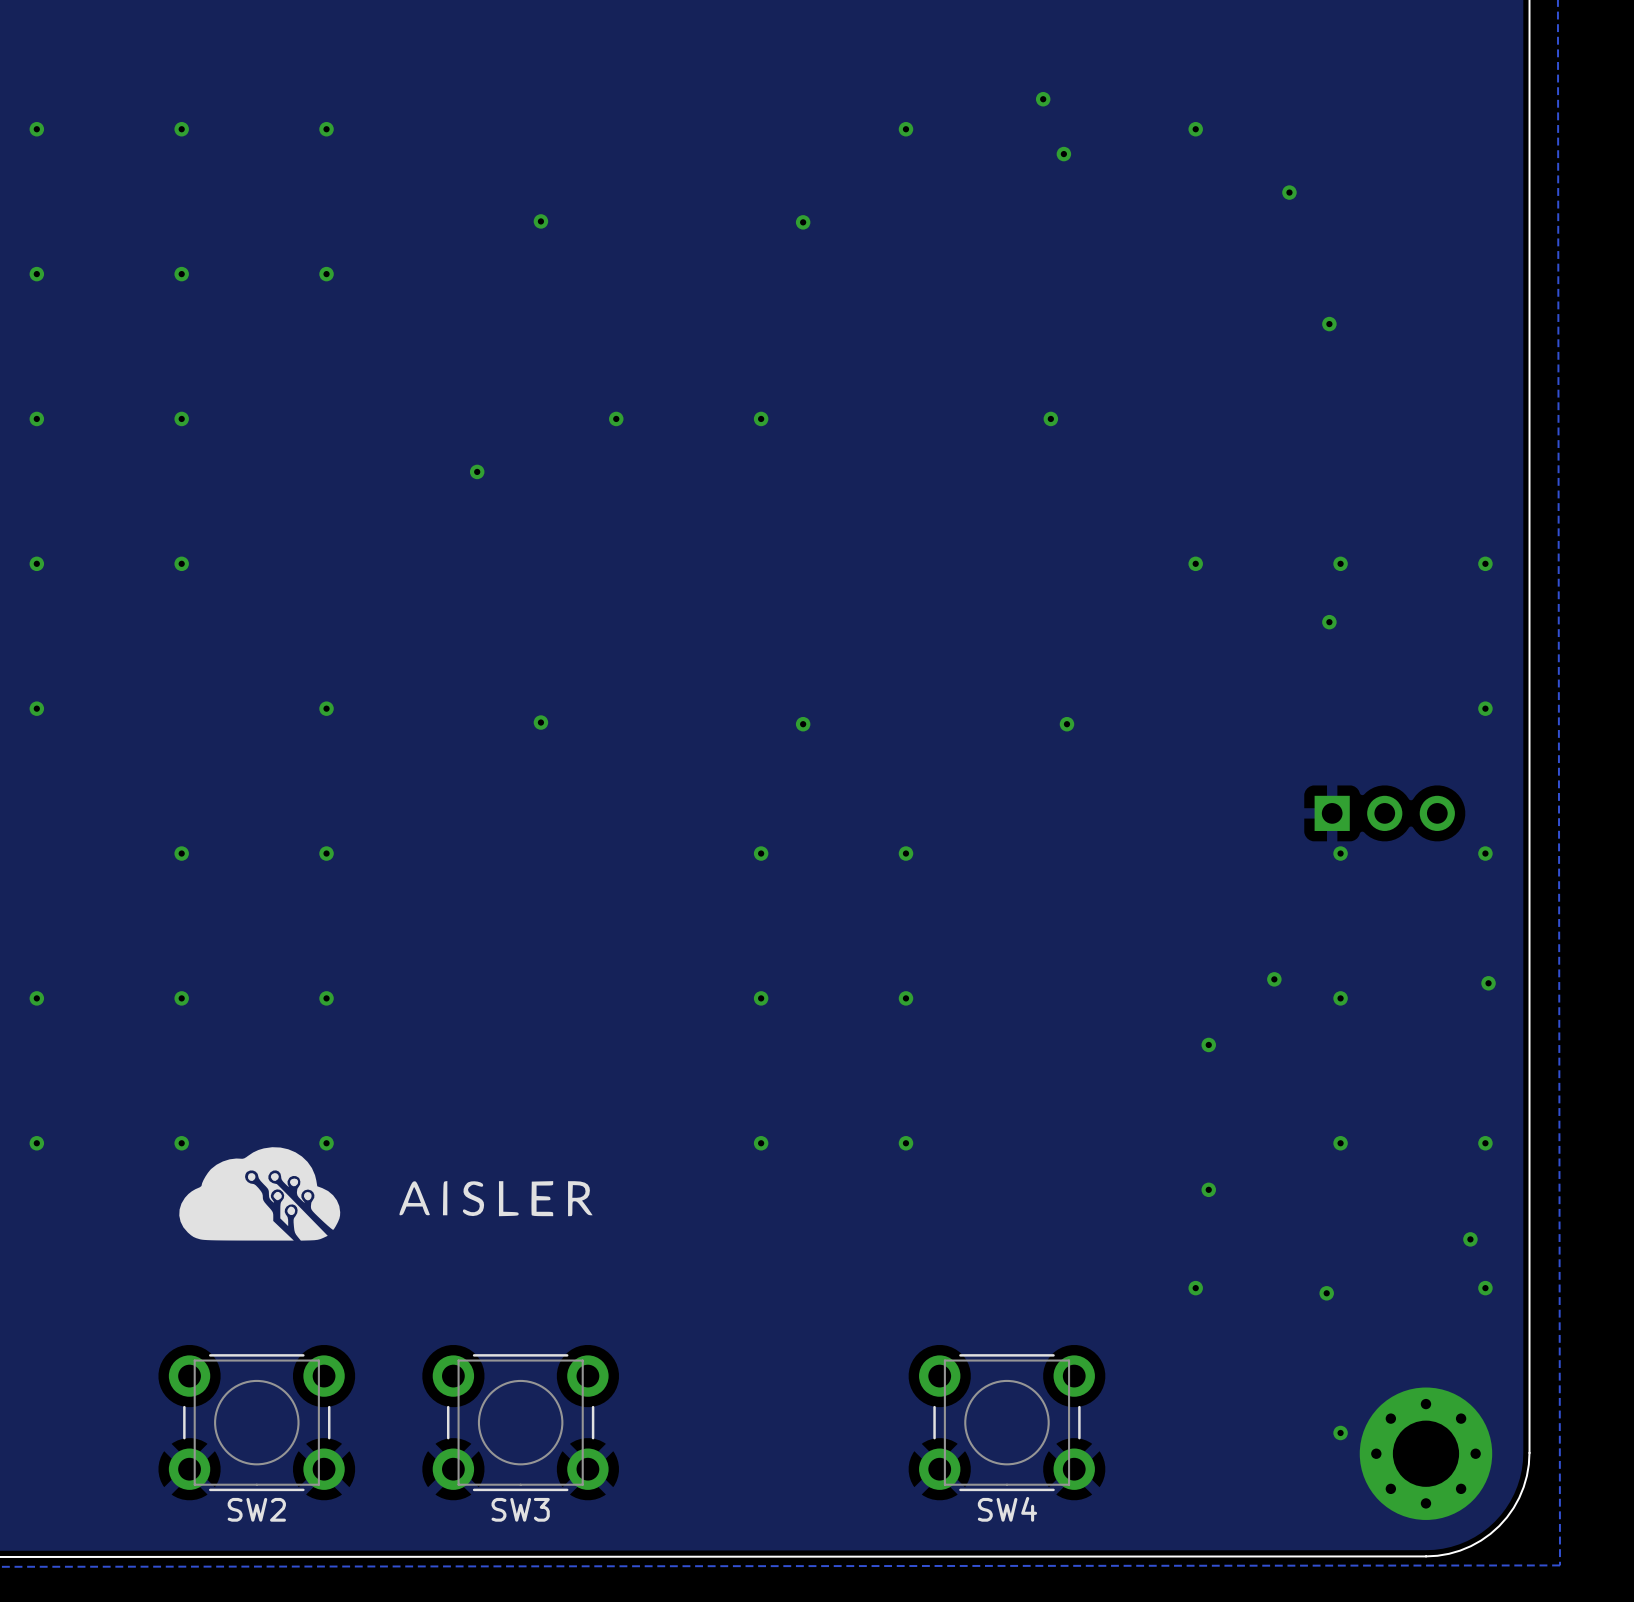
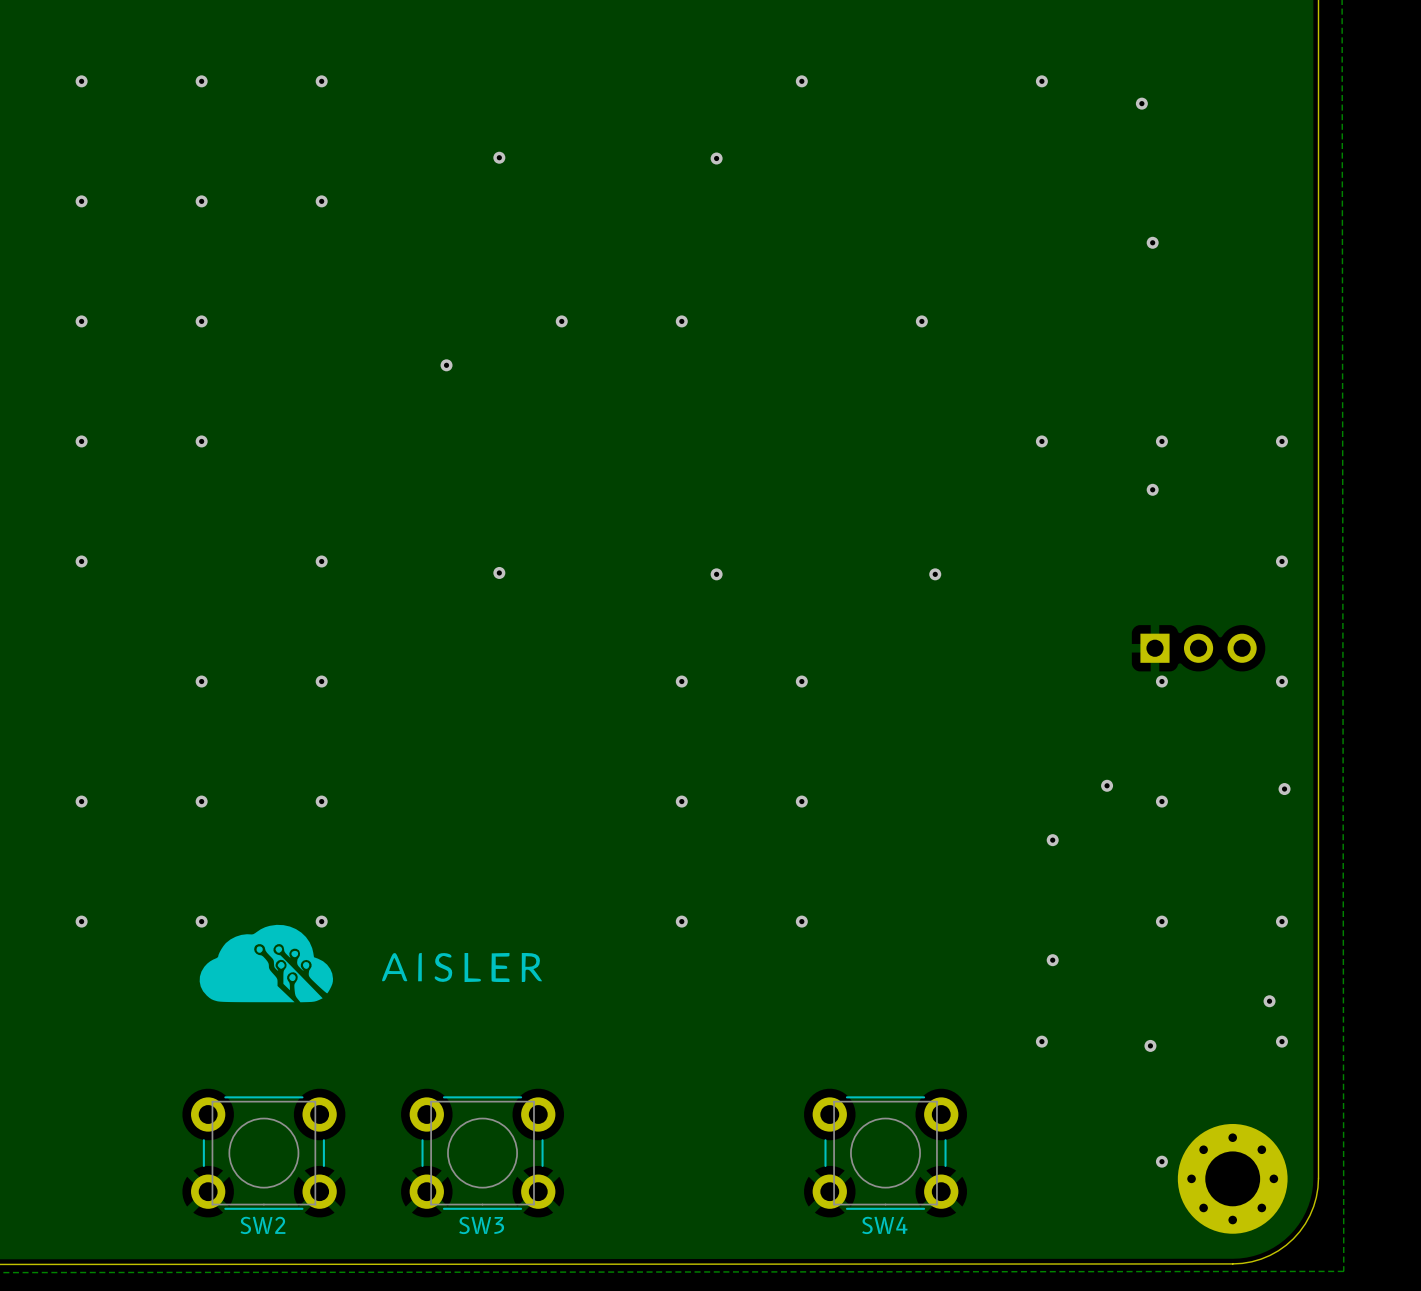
via: (1043, 99) -> none
via: (1063, 154) -> none
via position: (1289, 192) -> (1141, 103)

